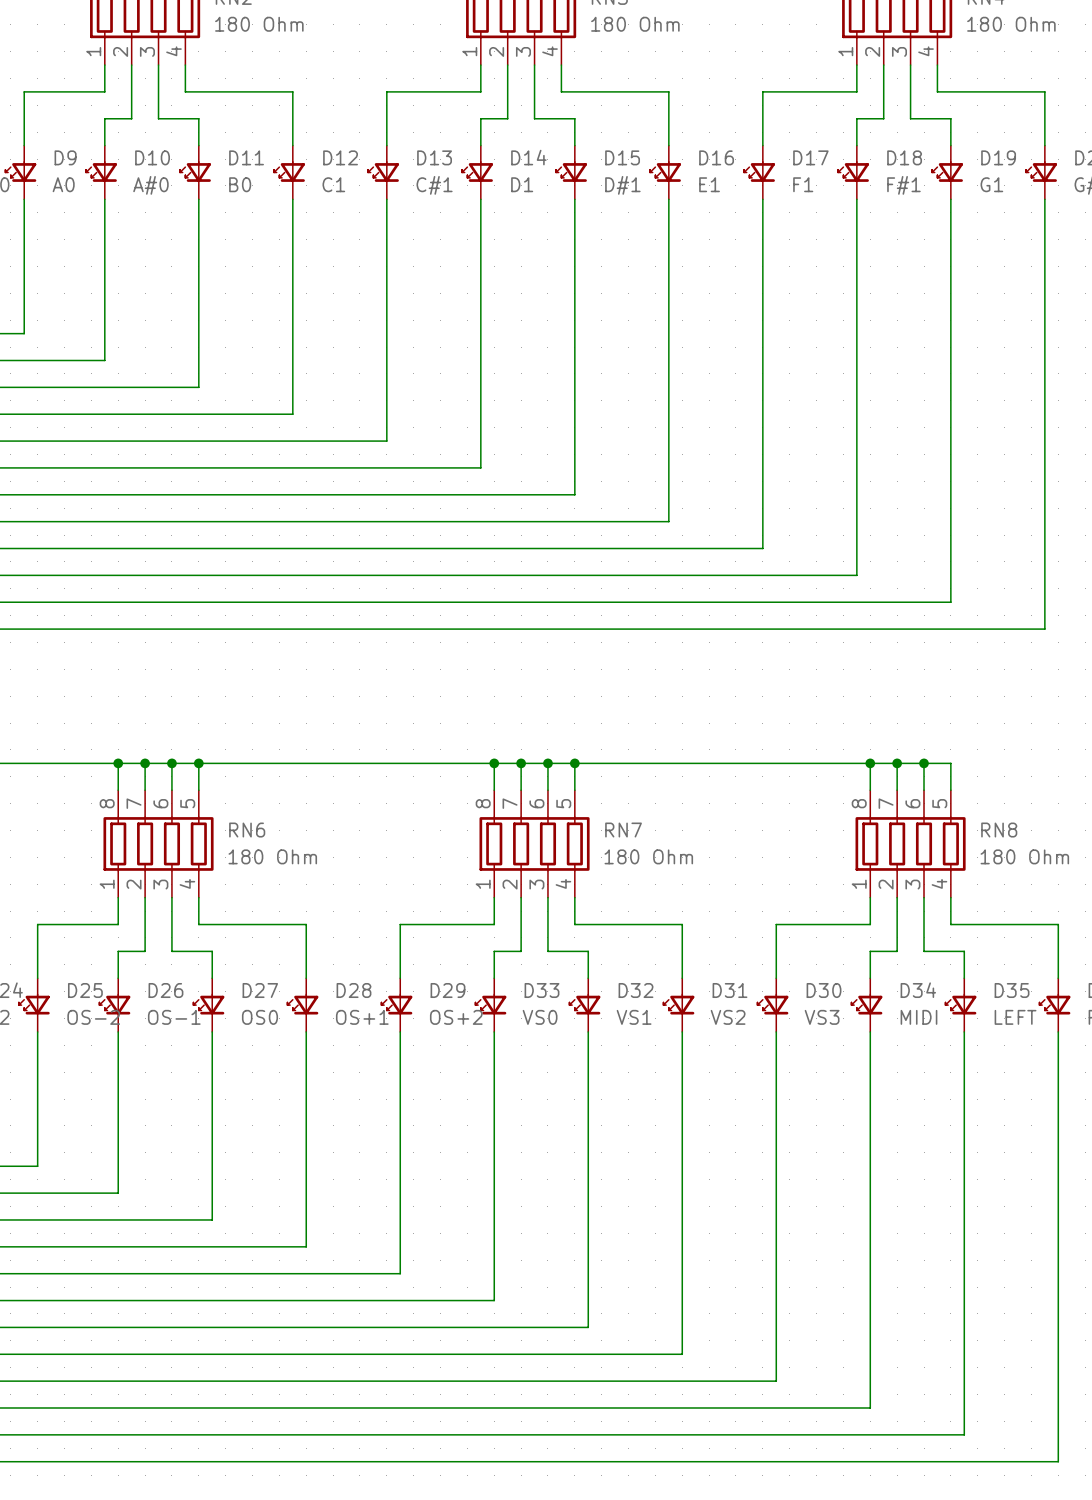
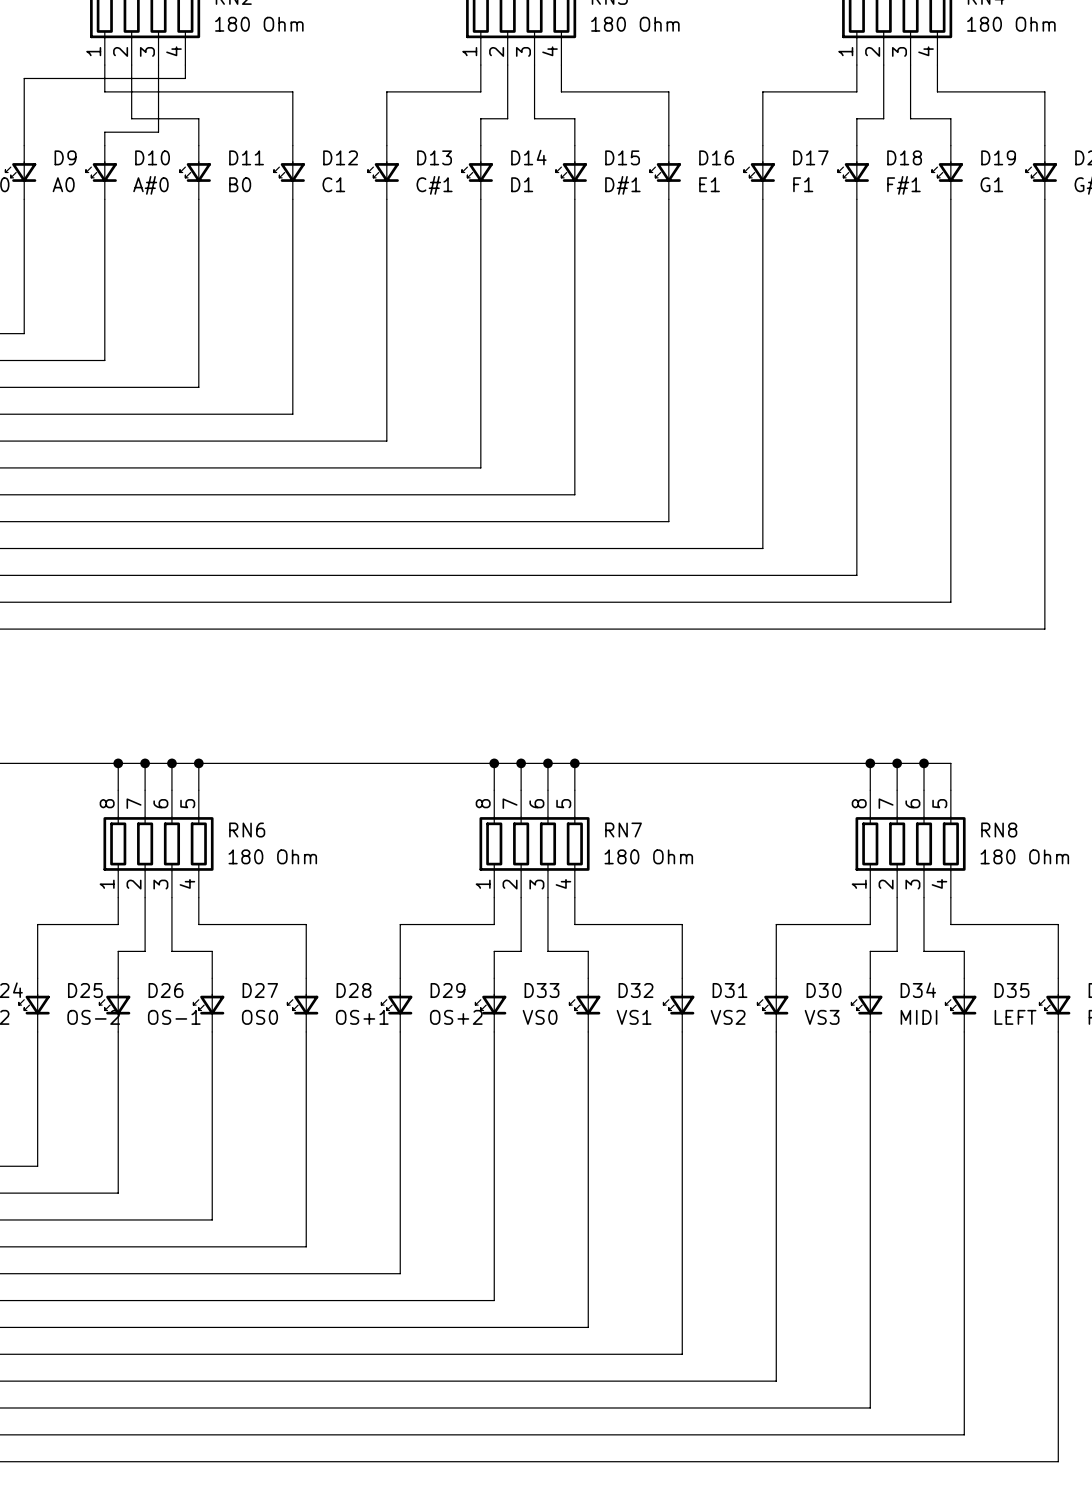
wire: (185, 78) (185, 91) -> (104, 91) (185, 91)
wire: (24, 91) (104, 91) -> (24, 91) (24, 78) (185, 78)
wire: (131, 118) (104, 118) (104, 132) -> (131, 118) (158, 118) (158, 132) (104, 132)

